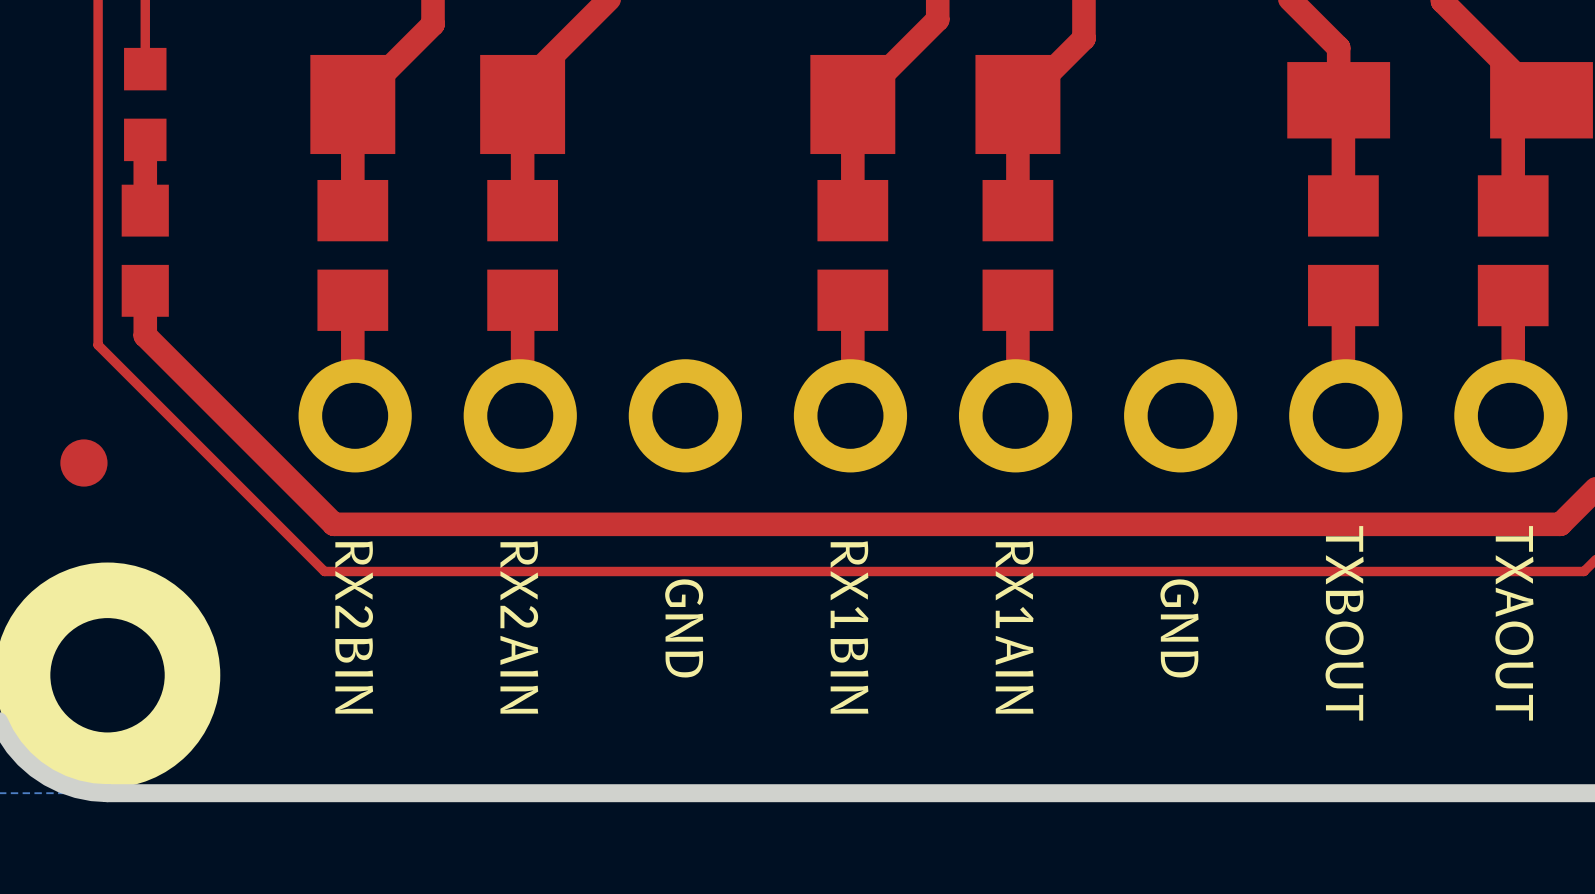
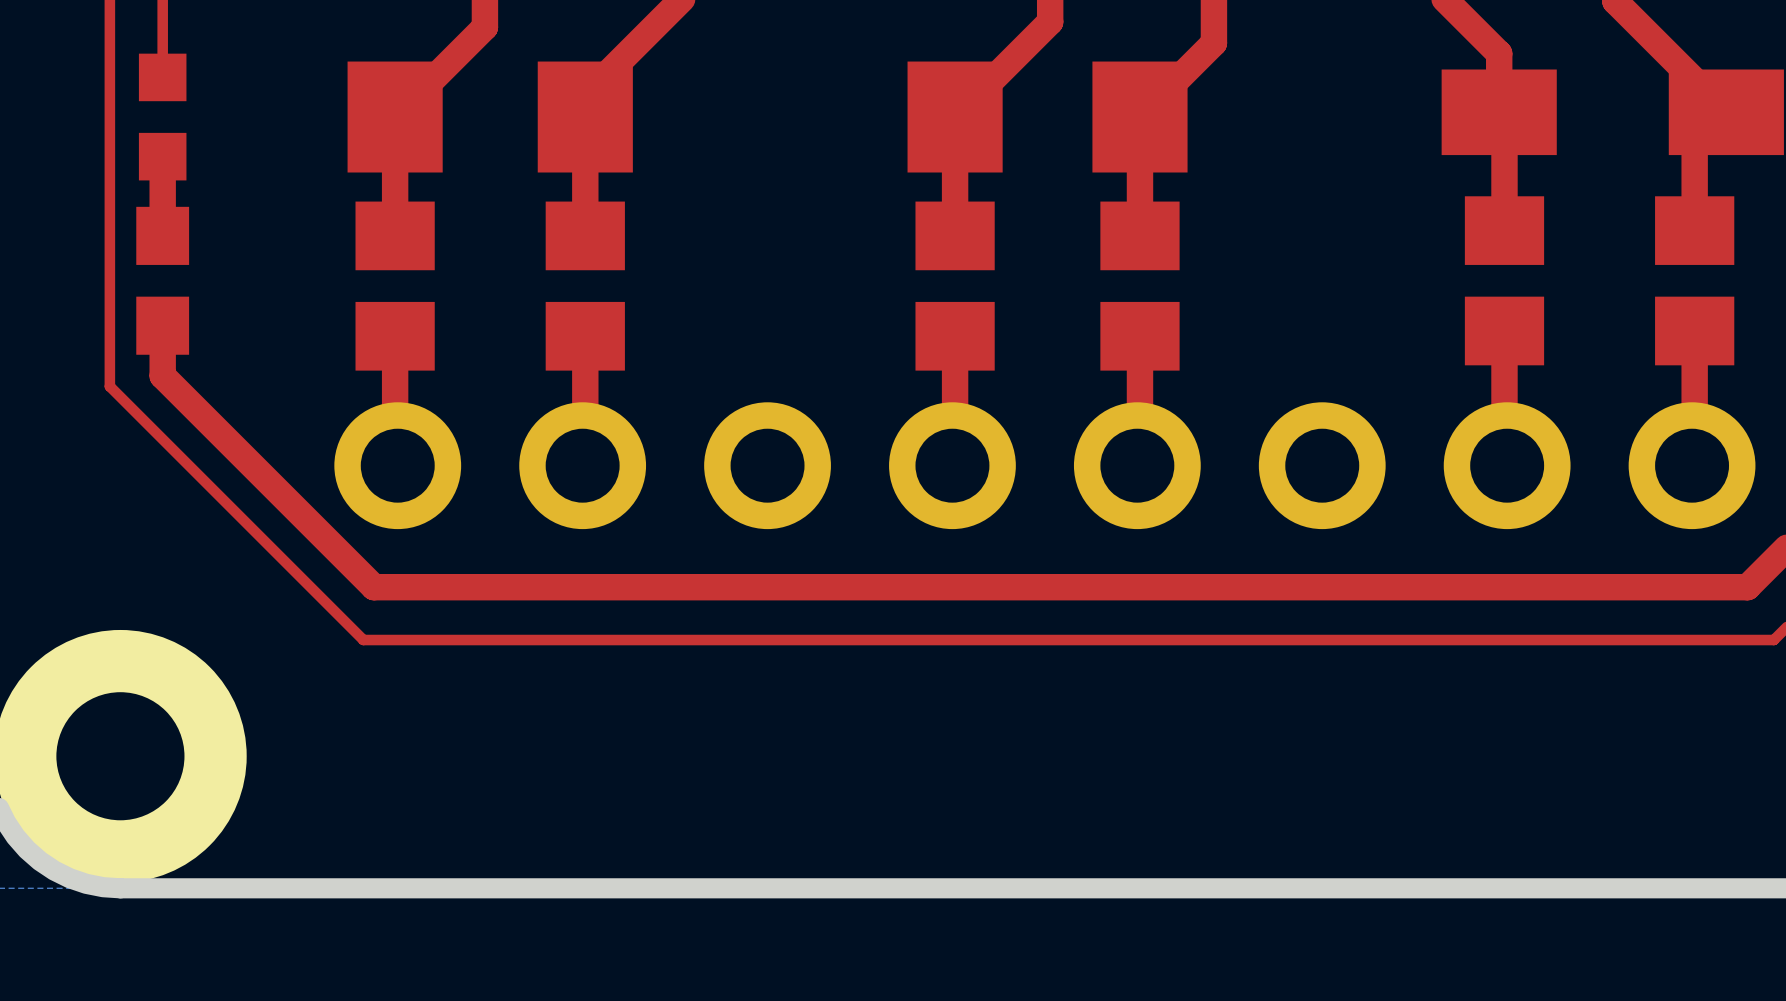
part: (83, 463) -> none
text: TXBOUT (1344, 623) -> none
text: TXAOUT (1514, 623) -> none
text: RX2BIN (354, 627) -> none
text: RX2AIN (519, 627) -> none
text: RX1BIN (849, 627) -> none
text: RX1AIN (1014, 627) -> none
text: GND (684, 628) -> none
text: GND (1179, 628) -> none

